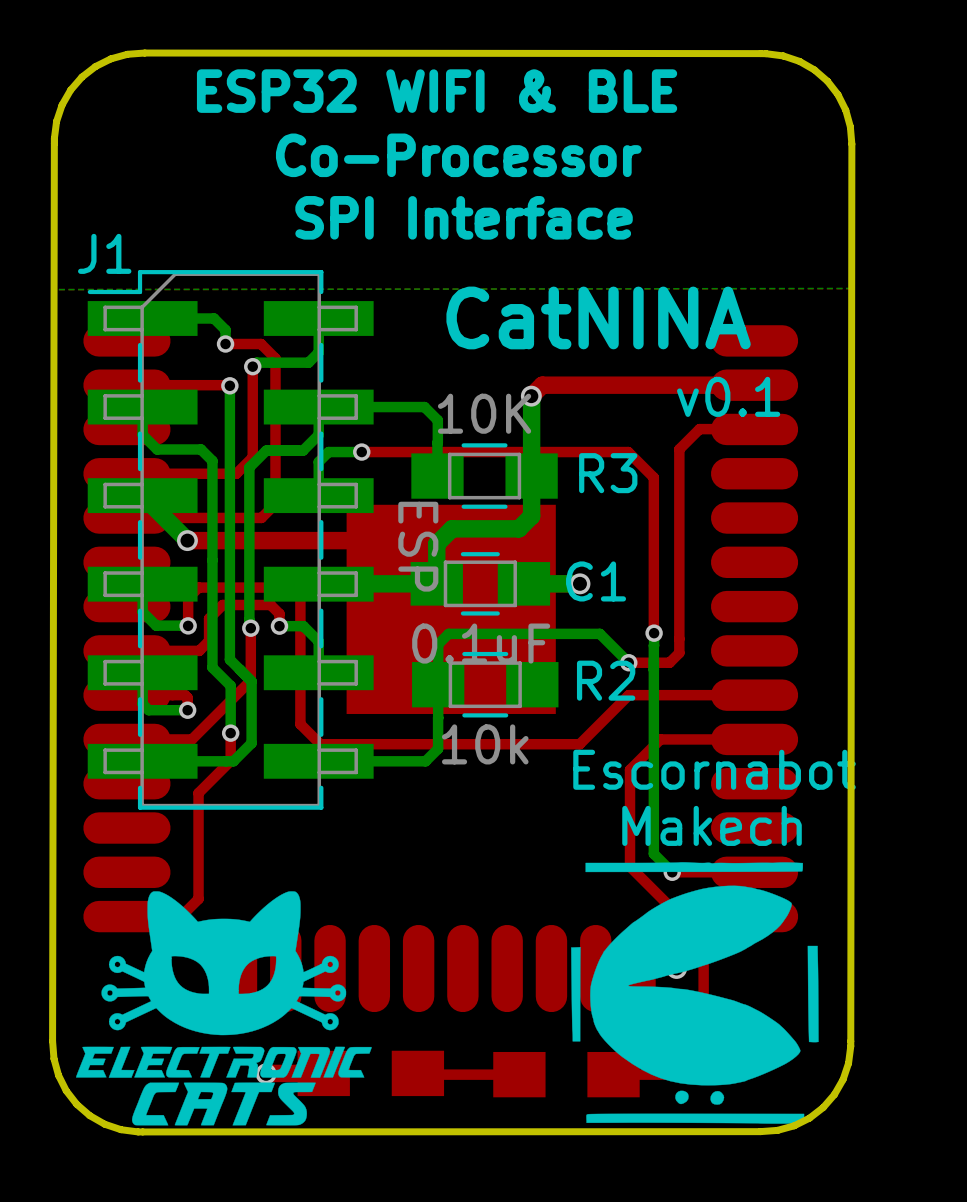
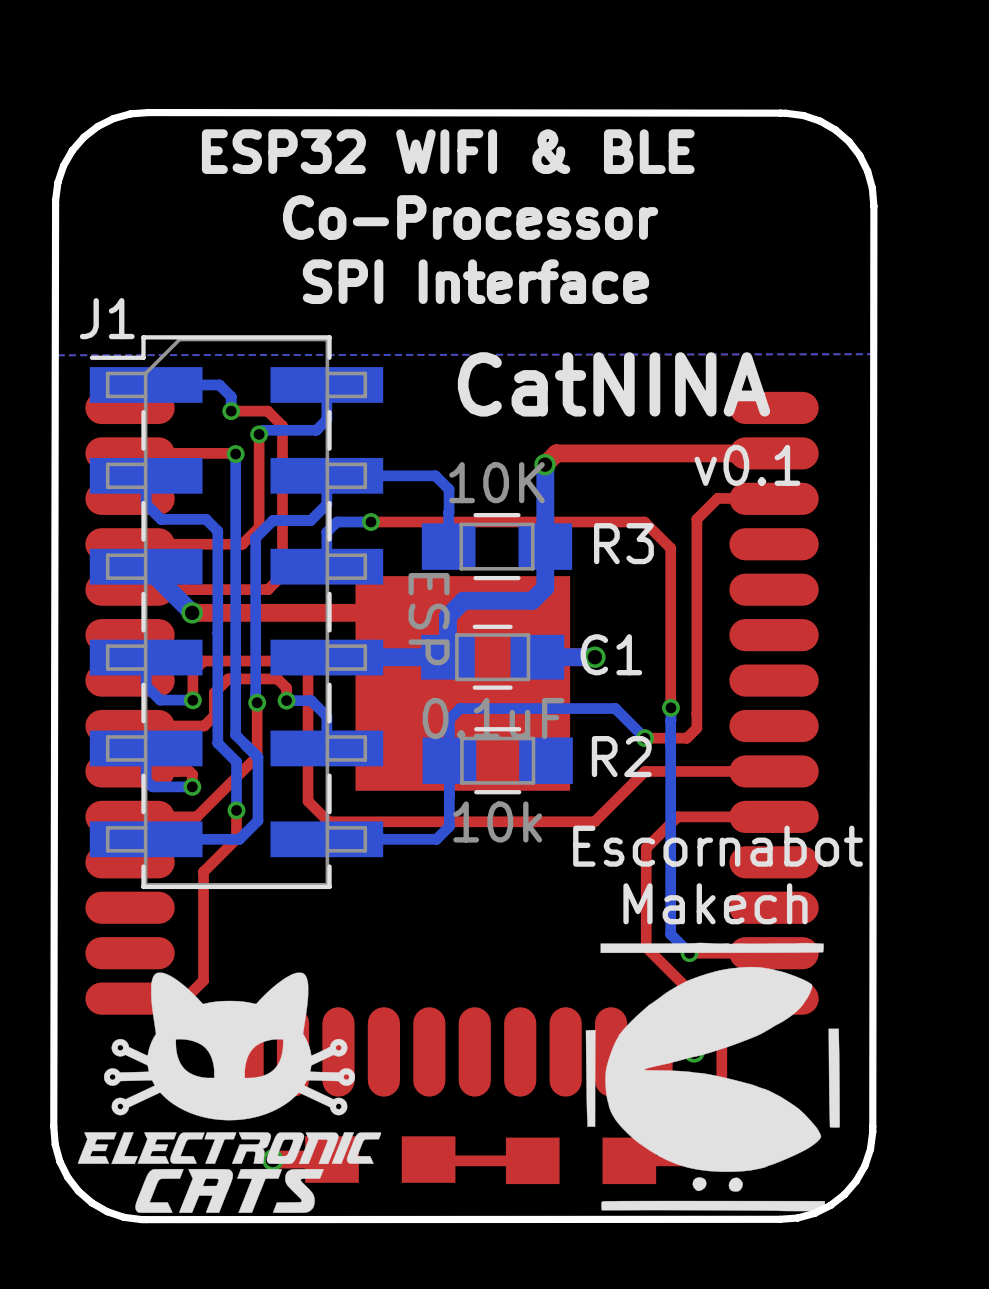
text position: Escornabot (714, 769) -> Escornabot (718, 846)
text position: Makech (712, 825) -> Makech (715, 903)

